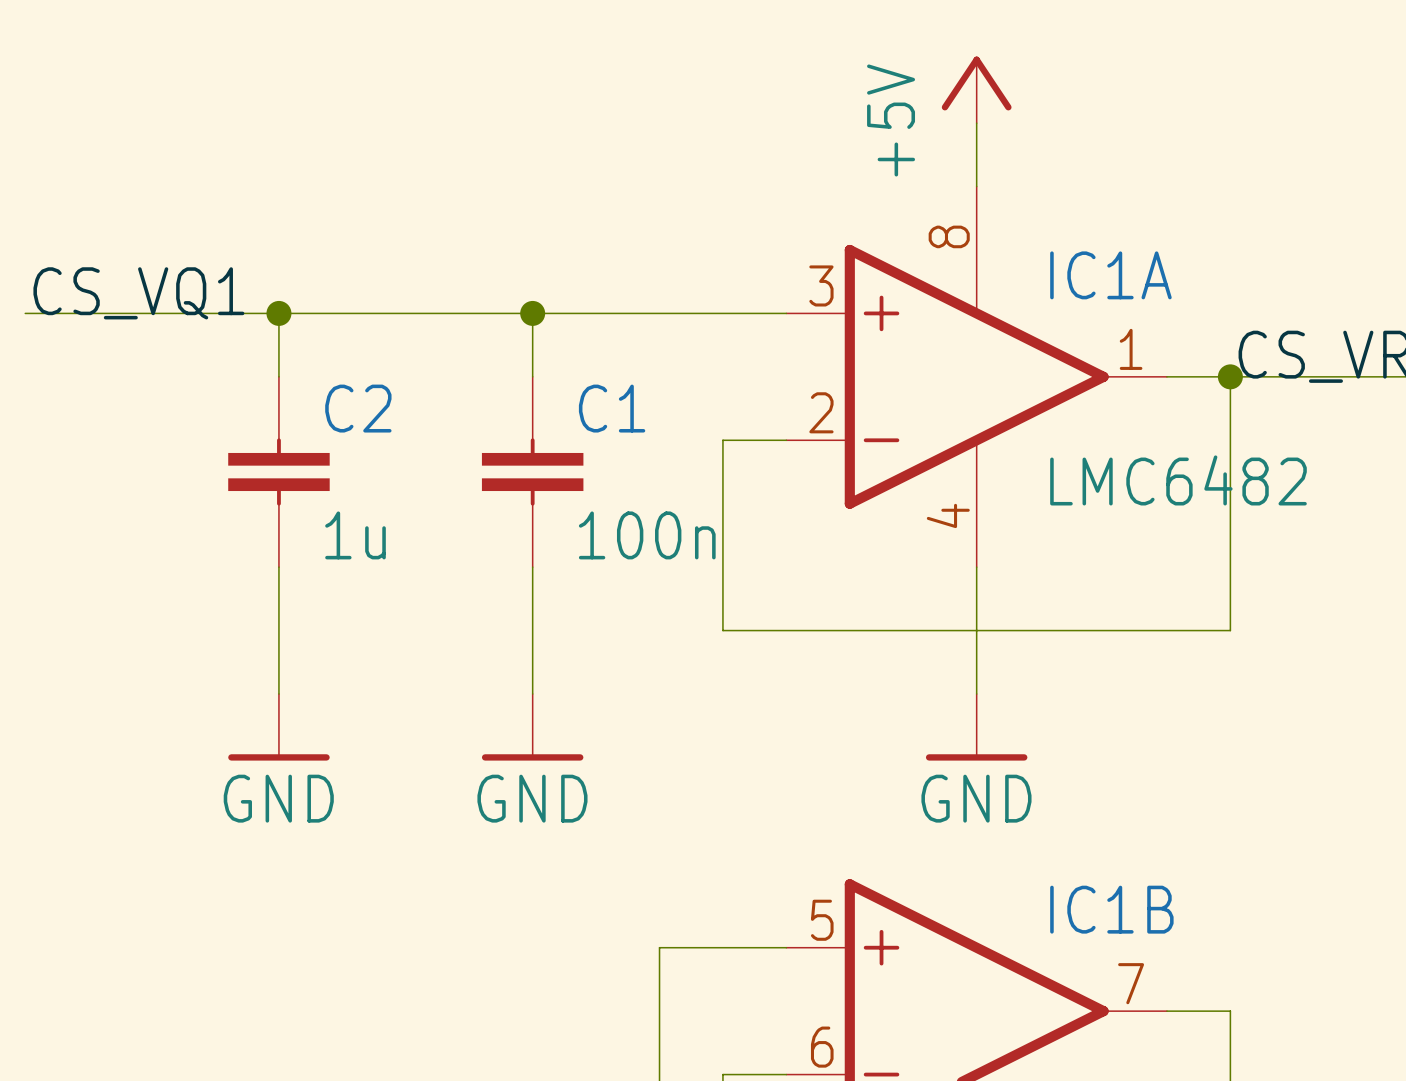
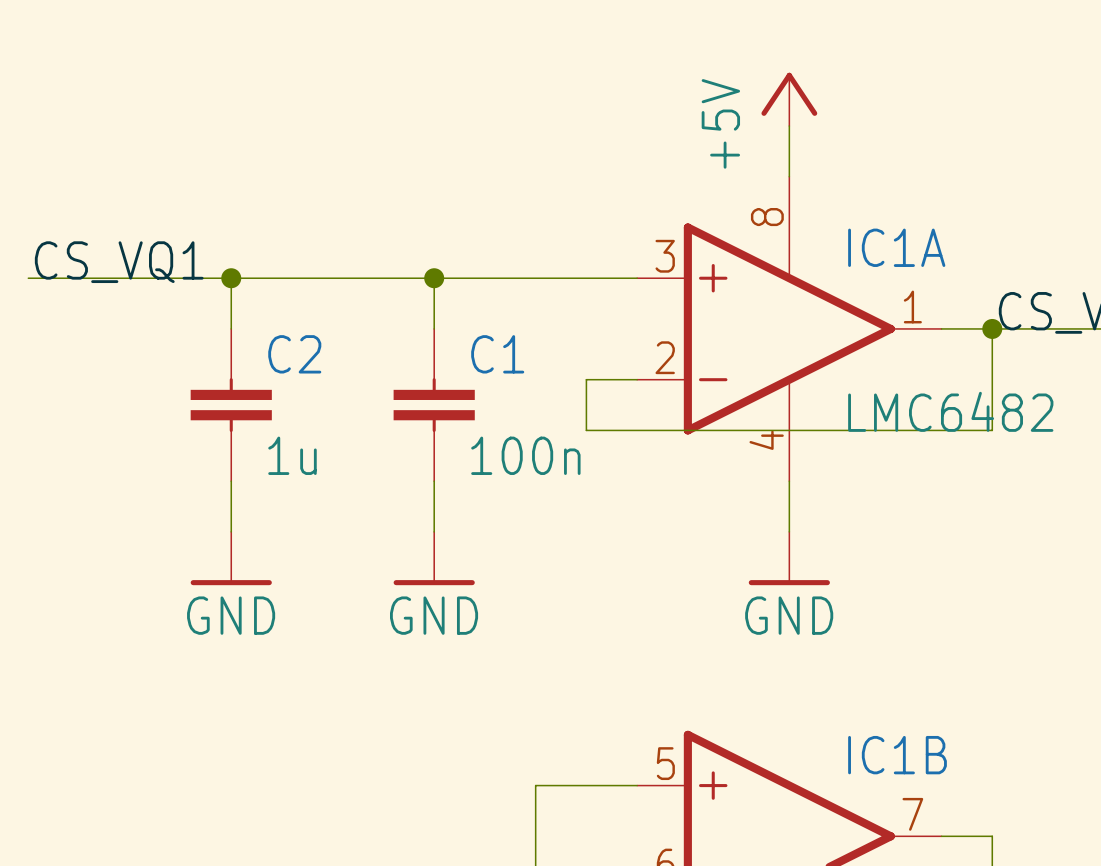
wire: (722, 503) (722, 630) (1230, 630) (1230, 503) -> (586, 430) (992, 430)
power symbol position: GND (278, 727) -> GND (231, 558)
power symbol position: GND (532, 727) -> GND (434, 558)
power symbol position: GND (976, 727) -> GND (789, 558)

